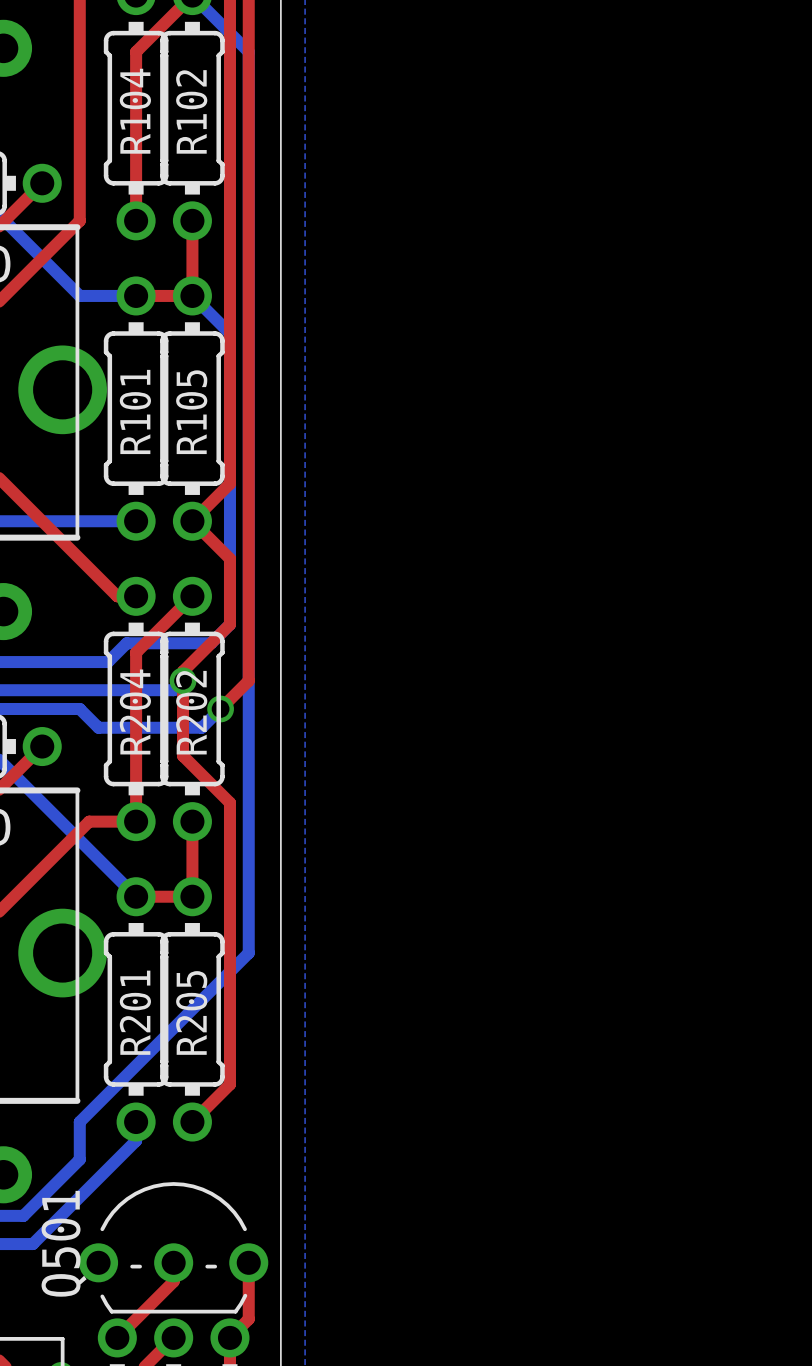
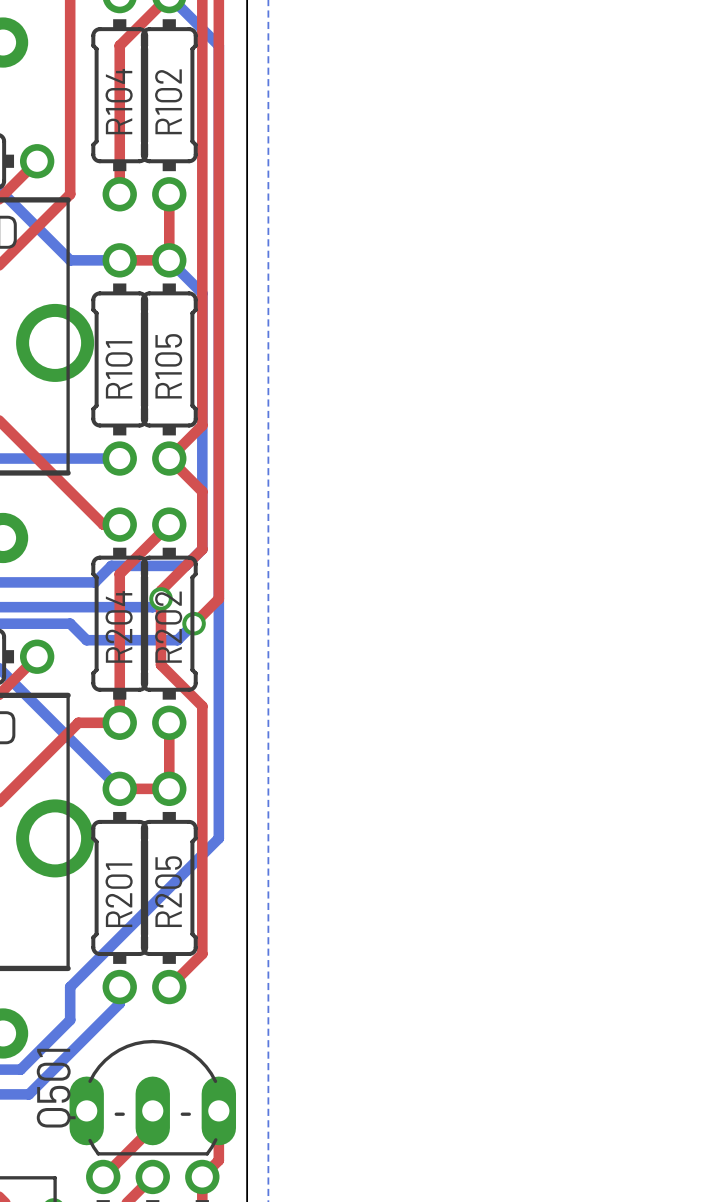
Q501 footprint: [79, 1182, 269, 1314] -> [69, 1039, 237, 1156]

